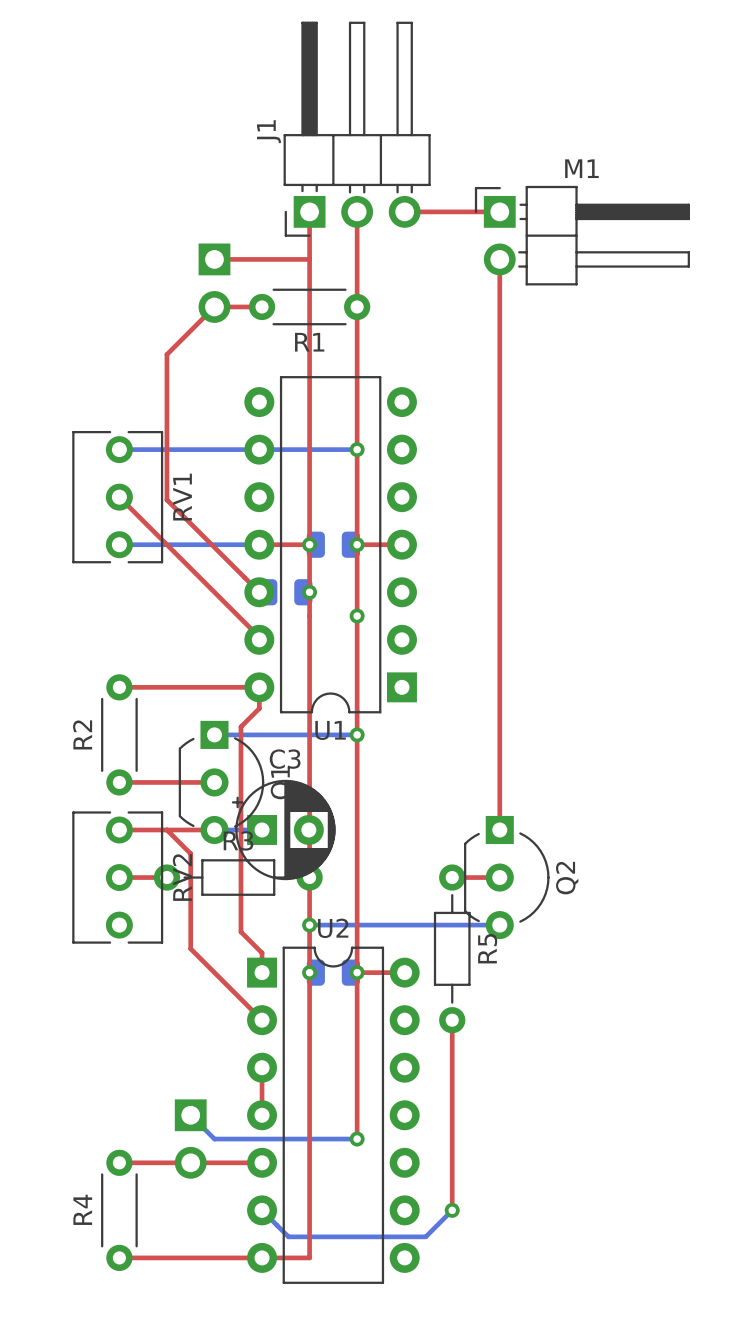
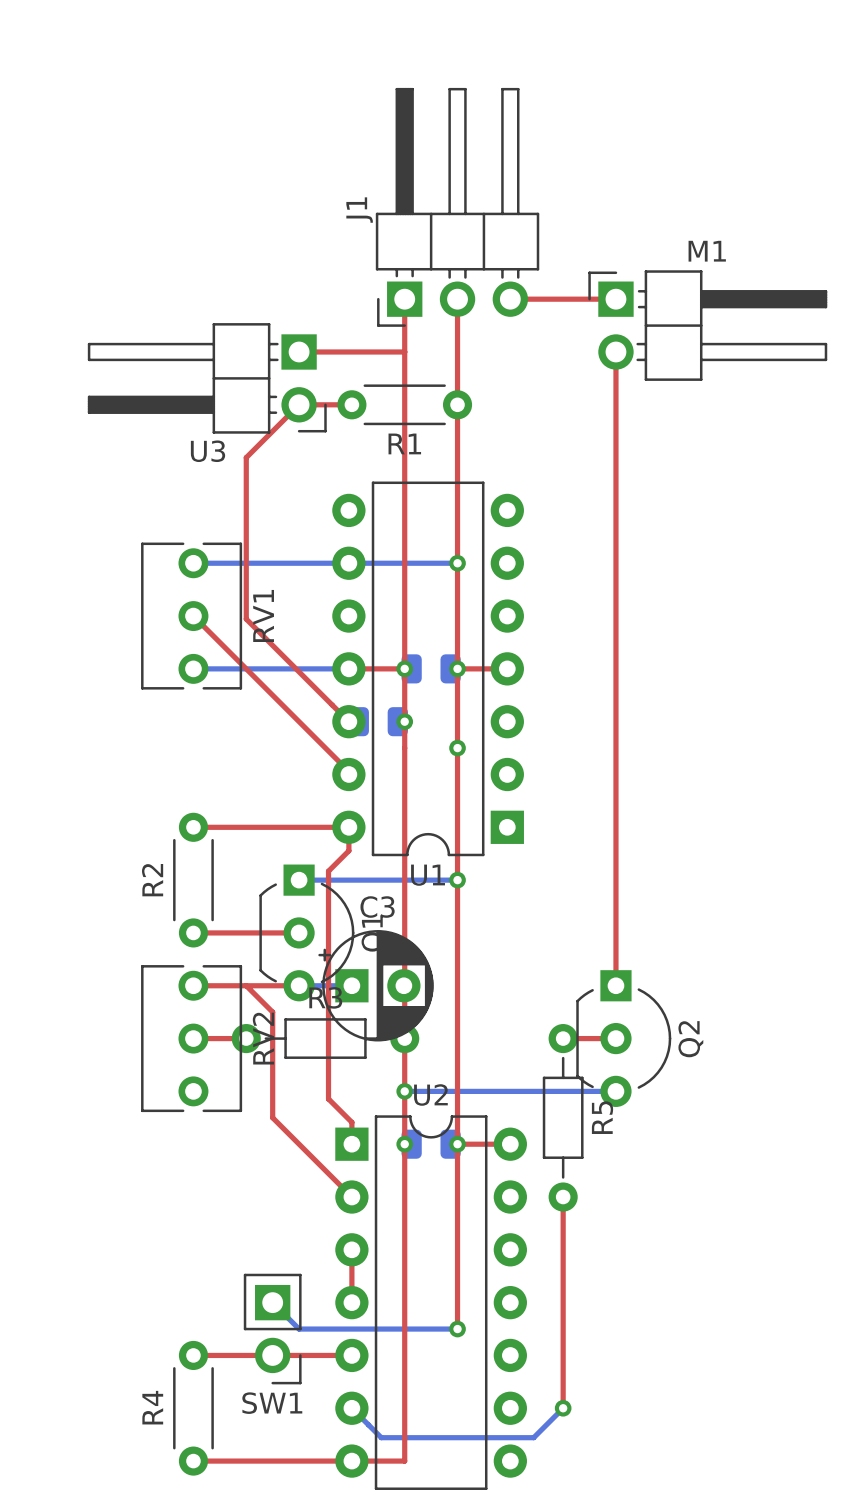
U3 side: bottom (214, 283) -> top (207, 378)
SW1 side: bottom (190, 1139) -> top (272, 1329)

